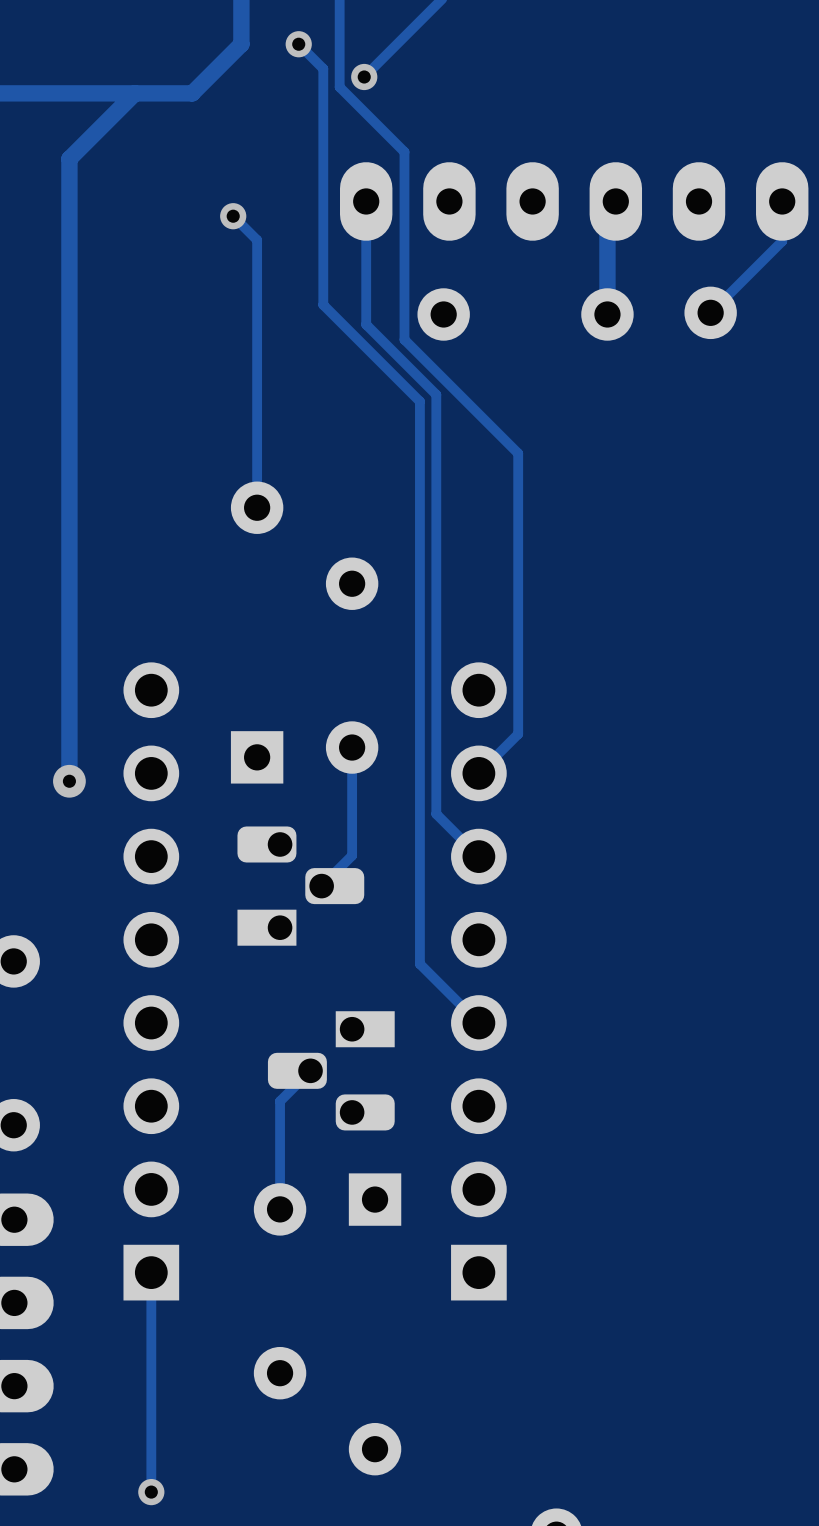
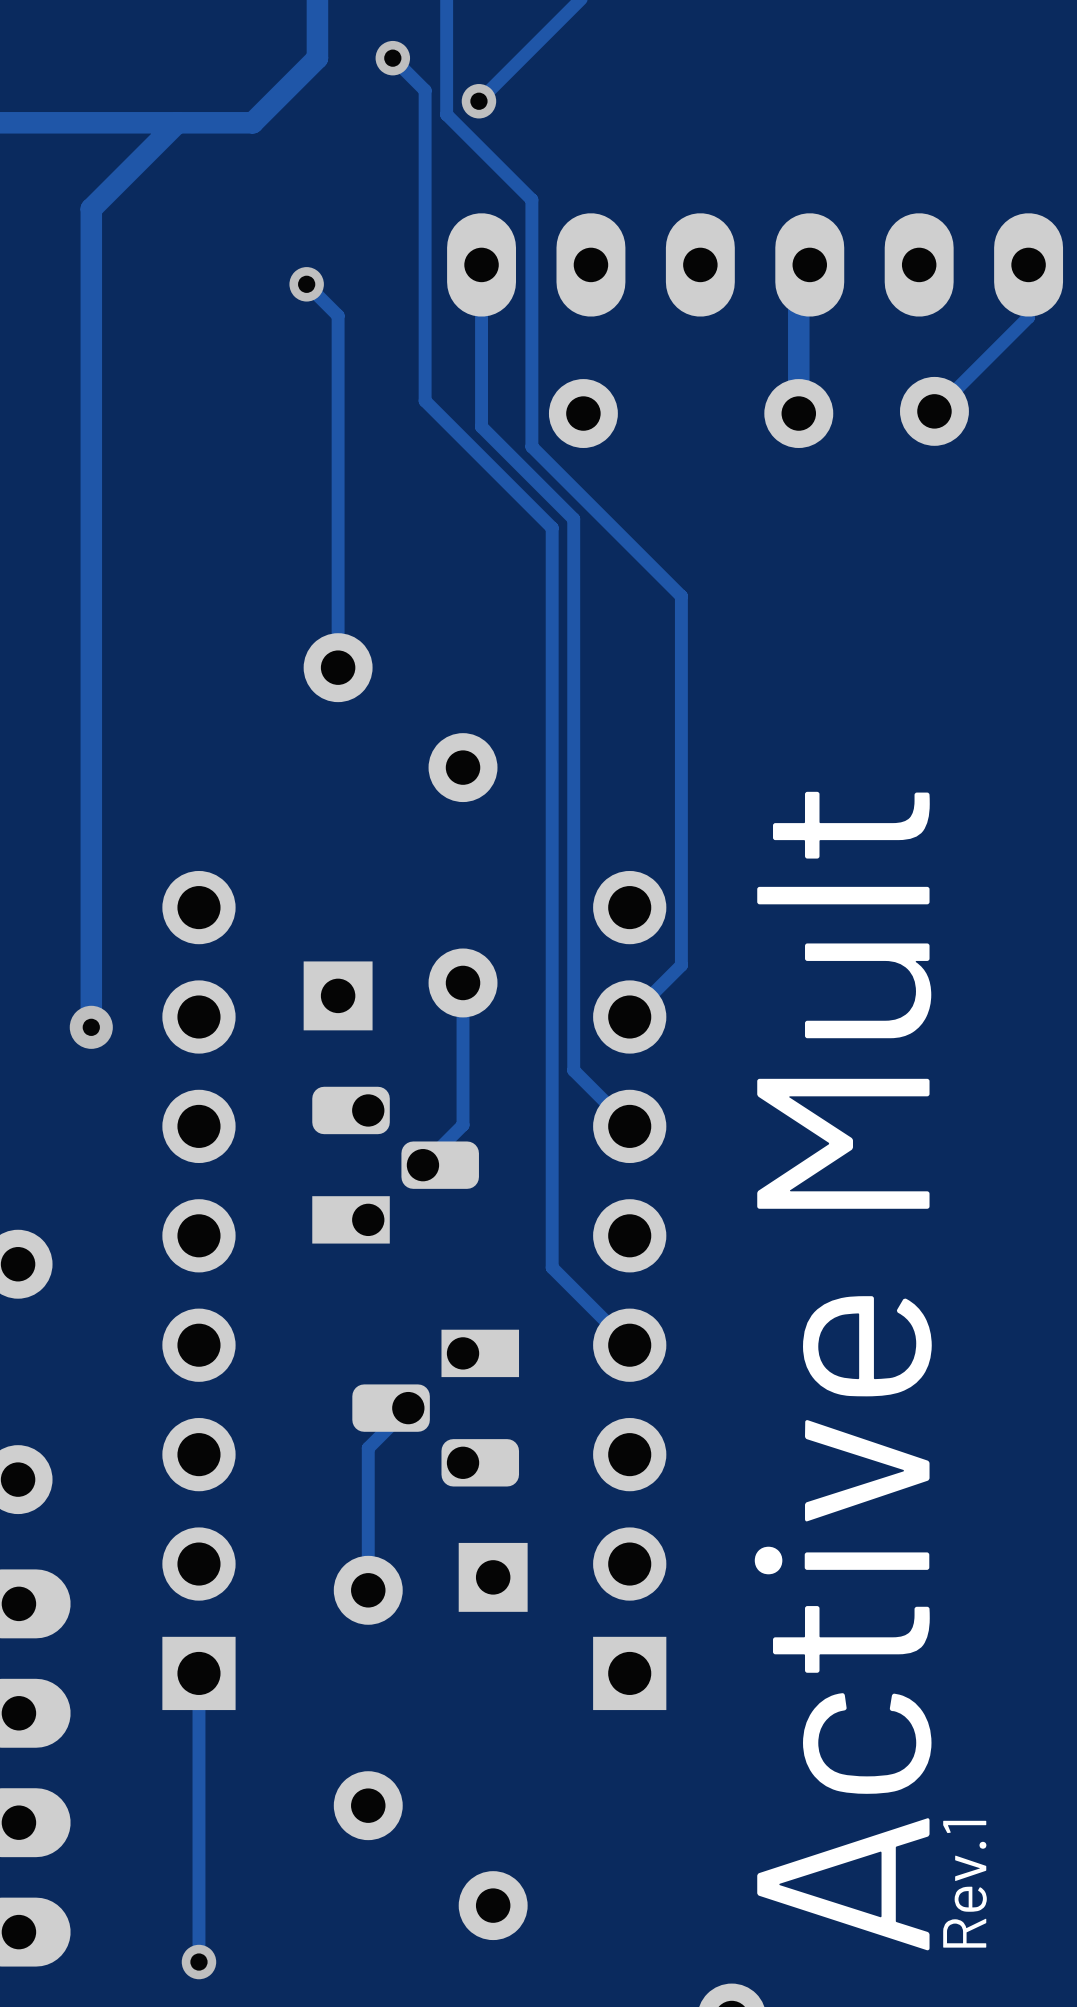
text: none -> Active Mult (843, 1371)
text: none -> Rev.1 (965, 1884)

